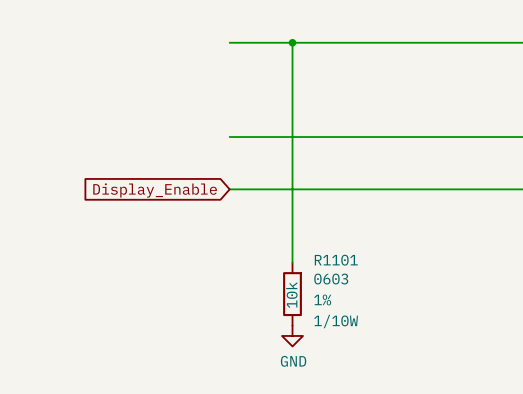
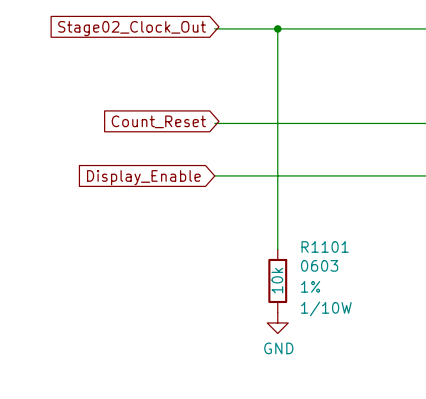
global label: none -> Stage02_Clock_Out (132, 28)
global label: none -> Count_Reset (158, 121)

